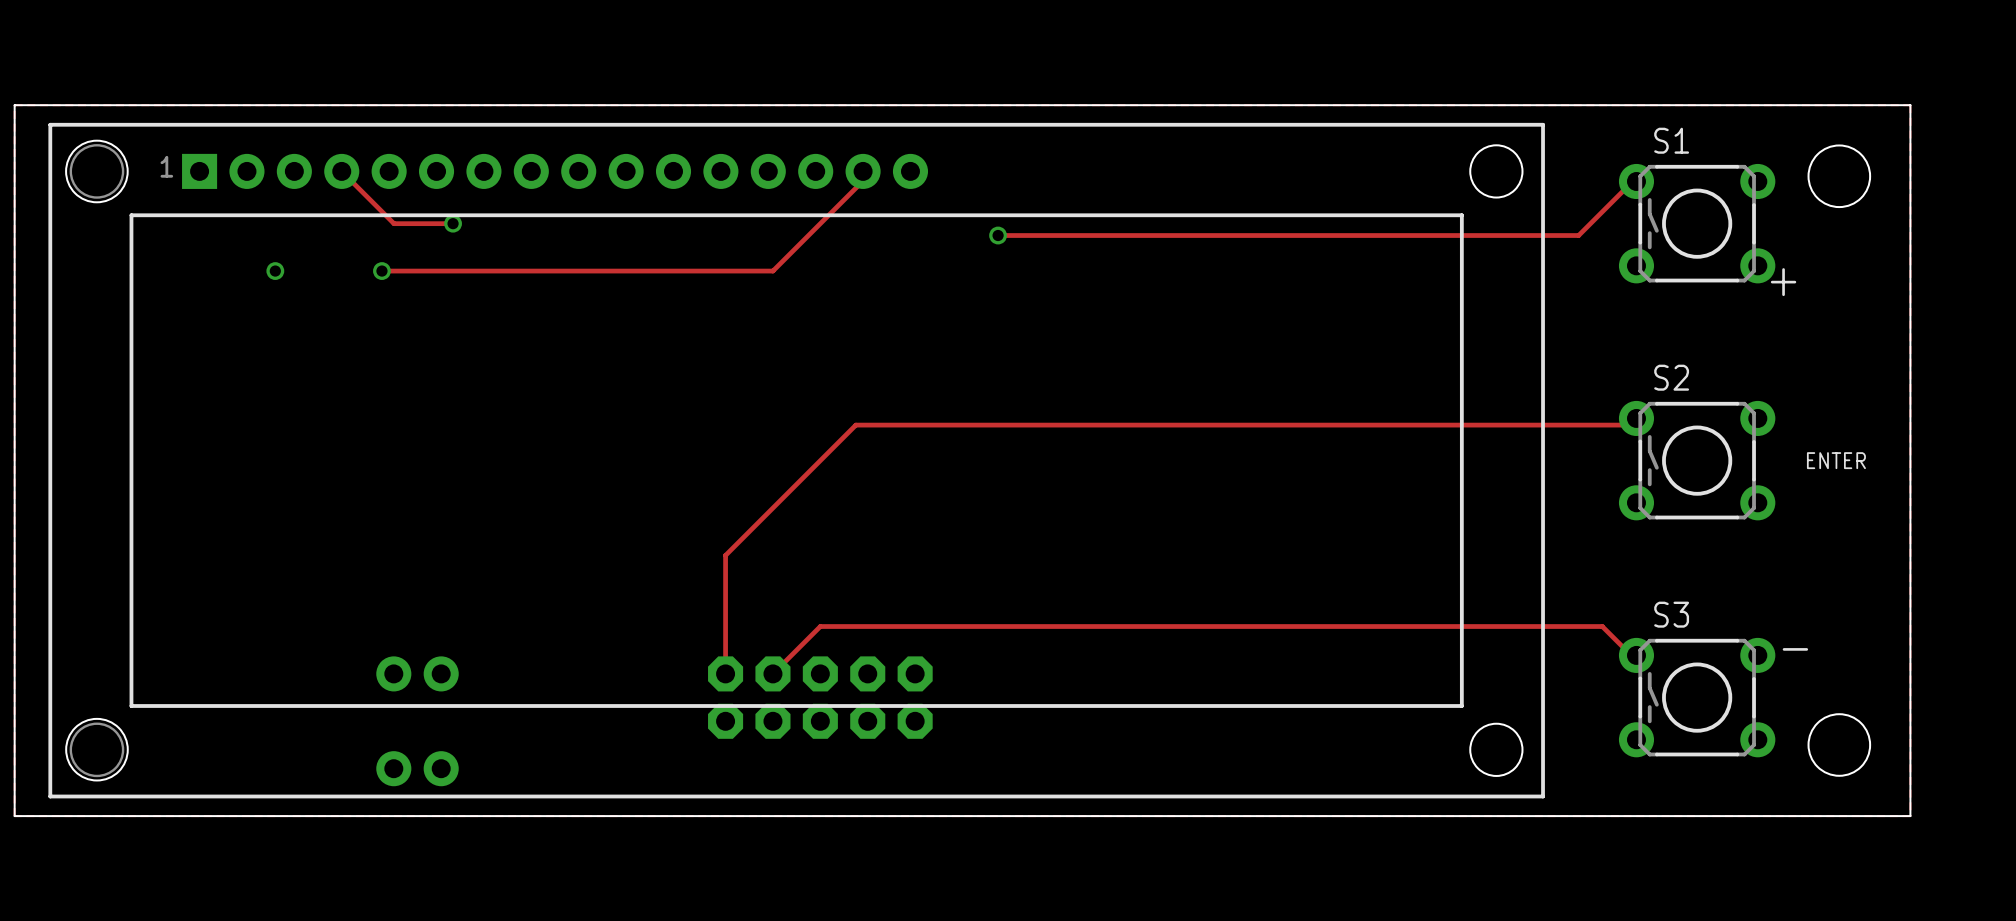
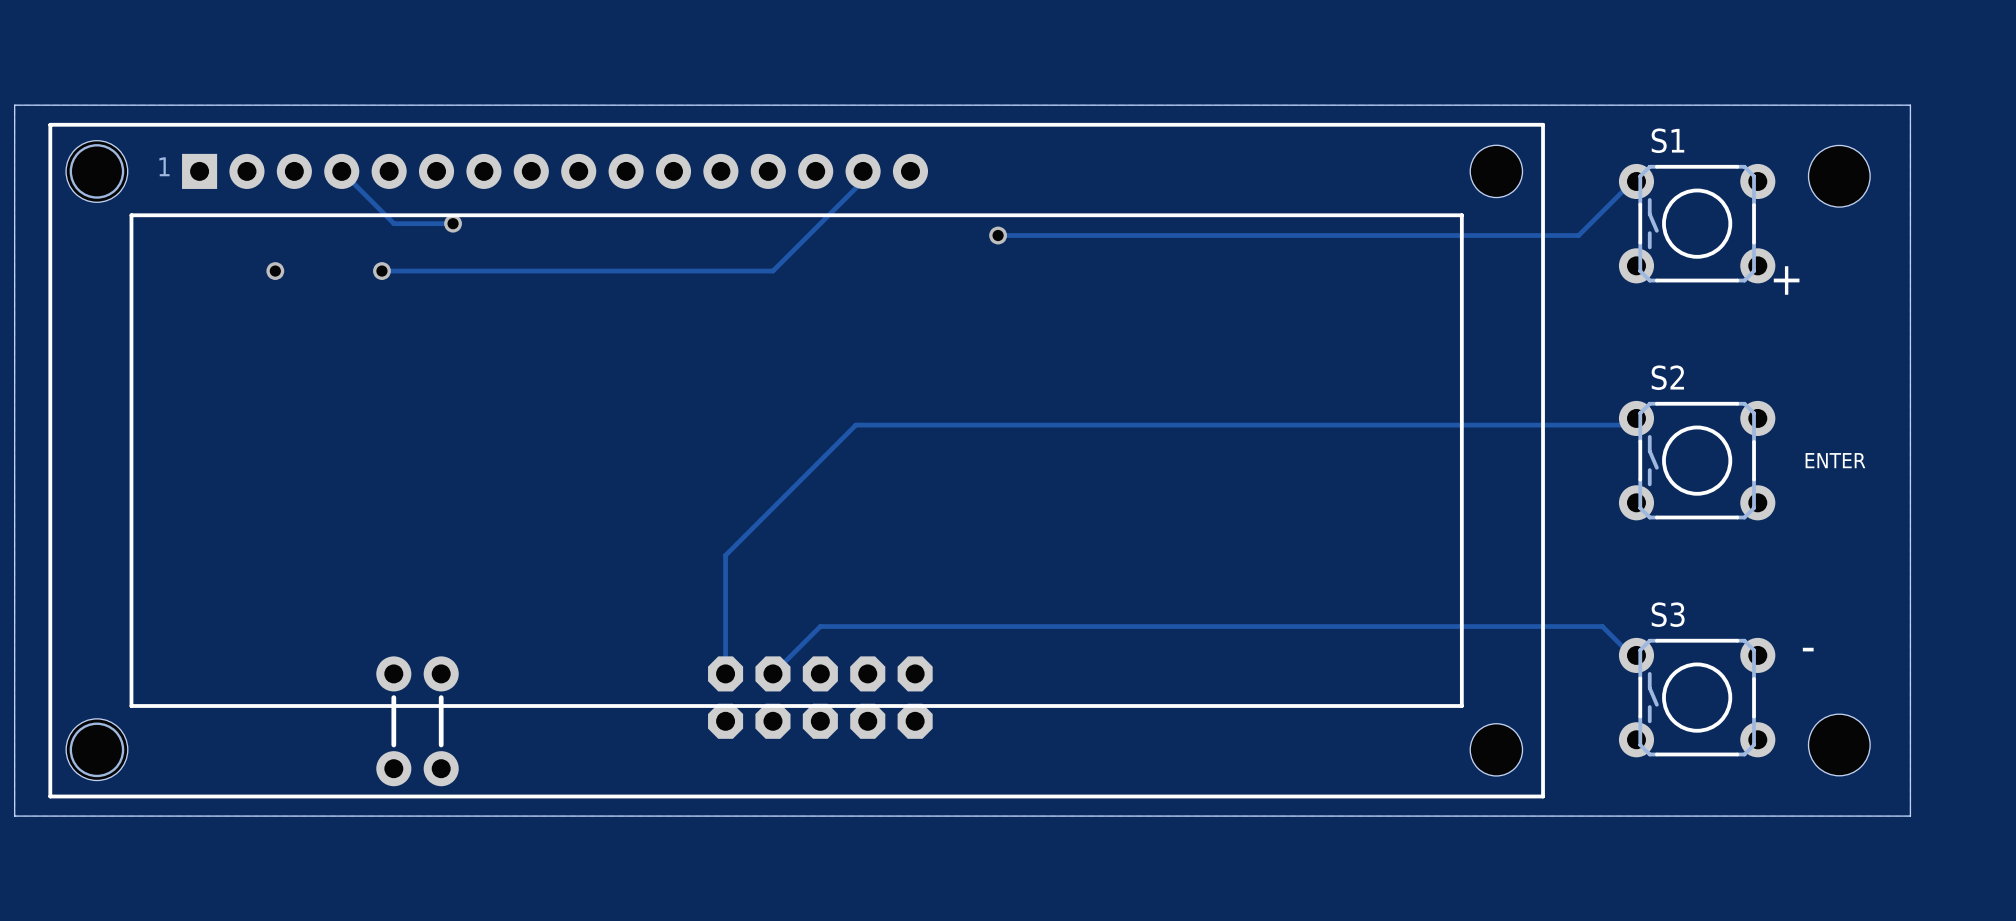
line: none -> (393, 697) (393, 744)
line: none -> (441, 697) (441, 744)

